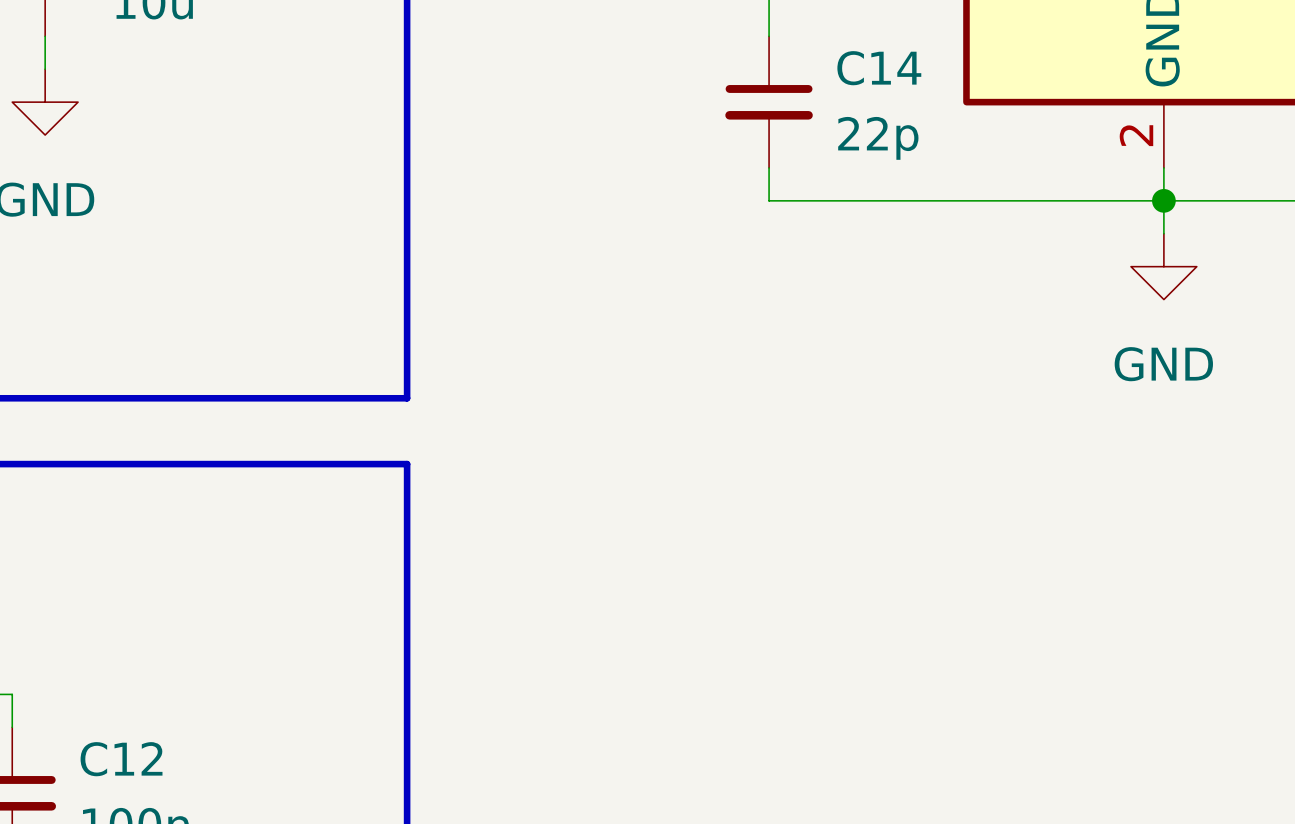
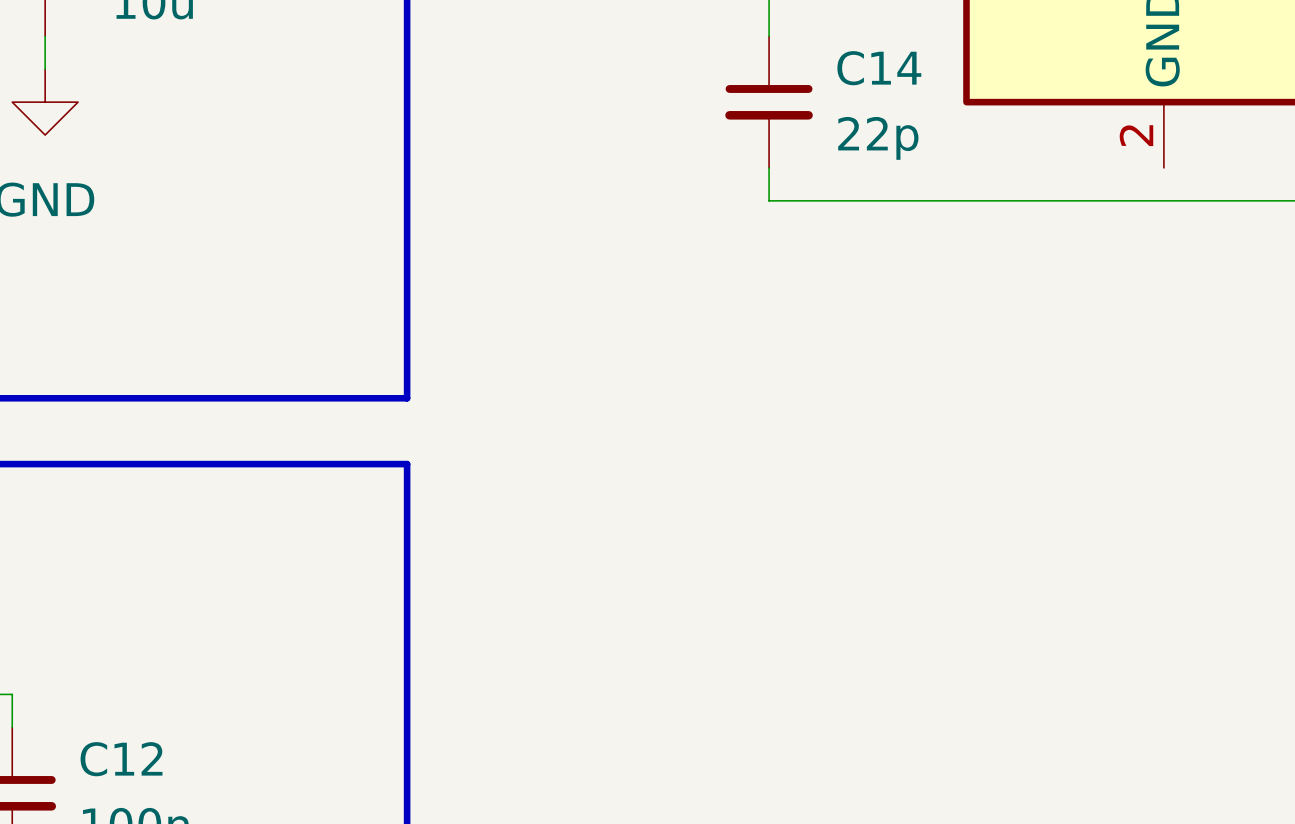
wire: (1163, 167) (1163, 233) -> none
junction: (1163, 200) -> none
power symbol: GND (1163, 266) -> none

